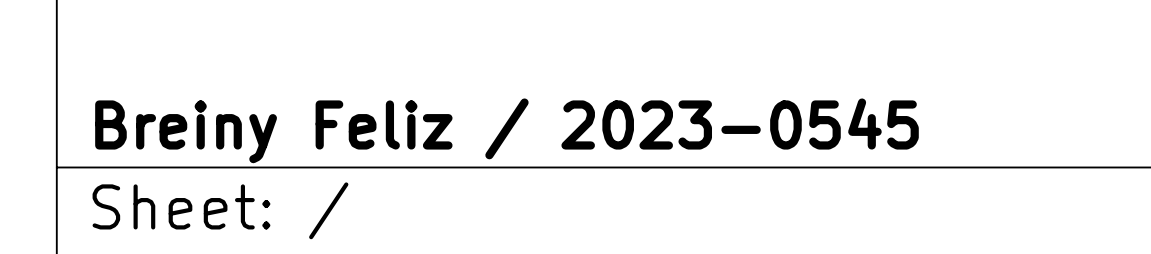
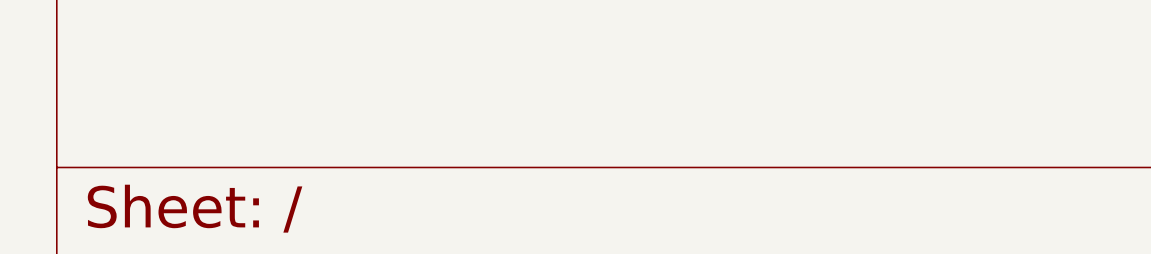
title block: Breiny Feliz / 2023-0545 (506, 130) -> none

